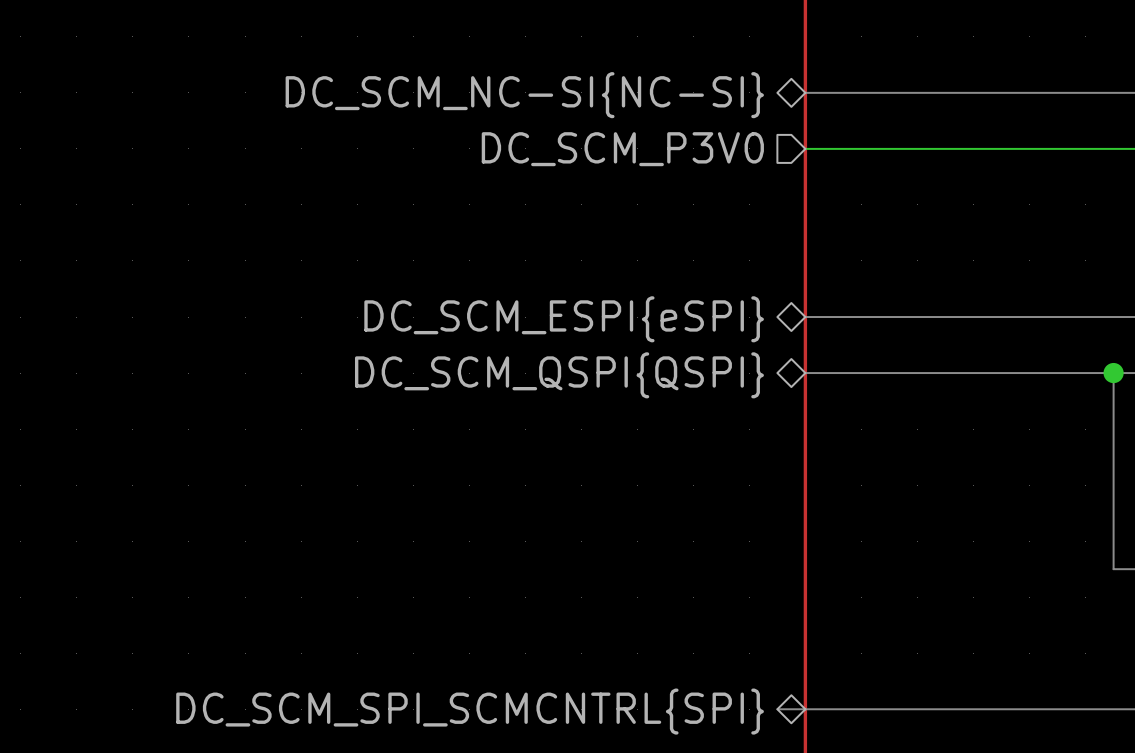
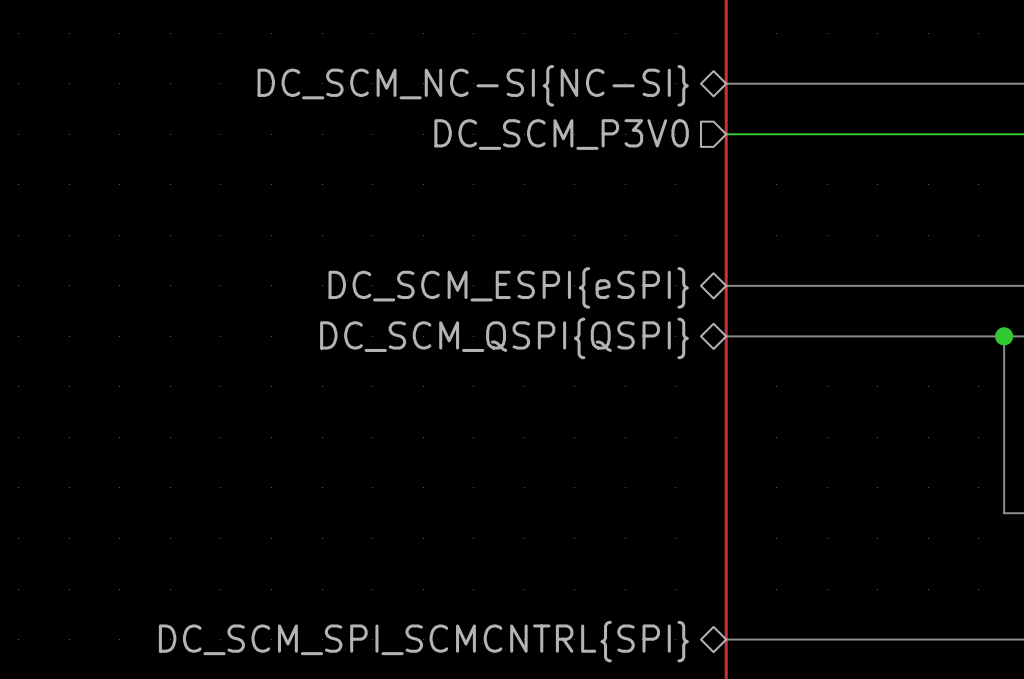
bus: (777, 709) (805, 709) -> none

